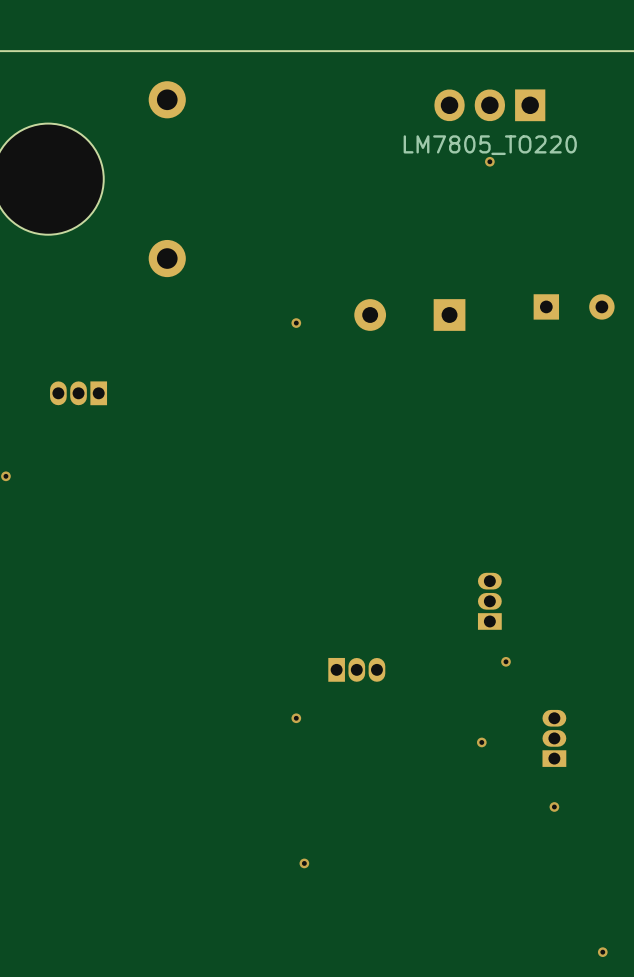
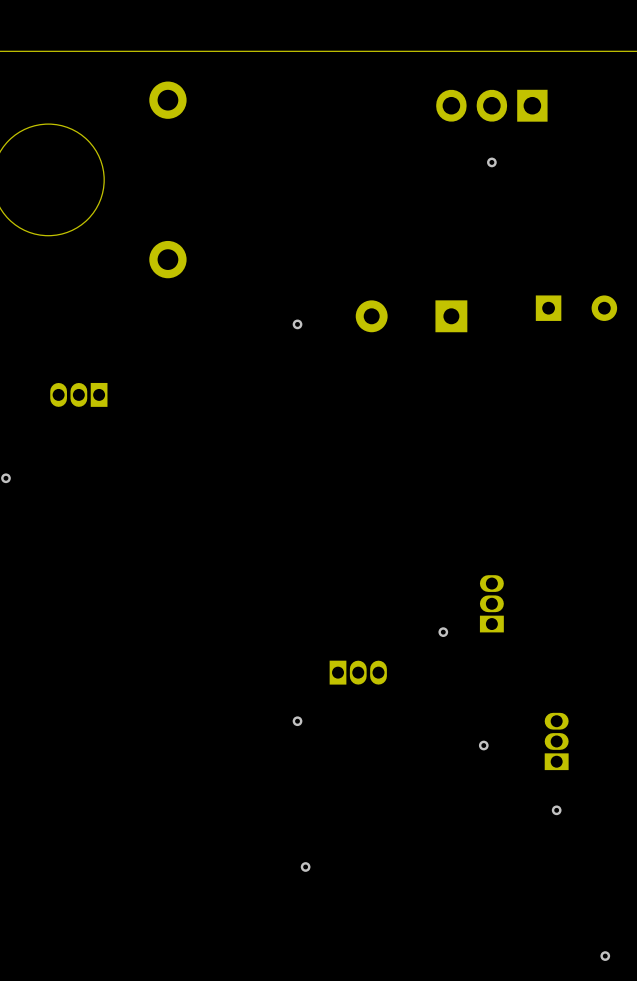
part value: LM7805_TO220 (490, 145) -> none
via position: (506, 661) -> (443, 632)

